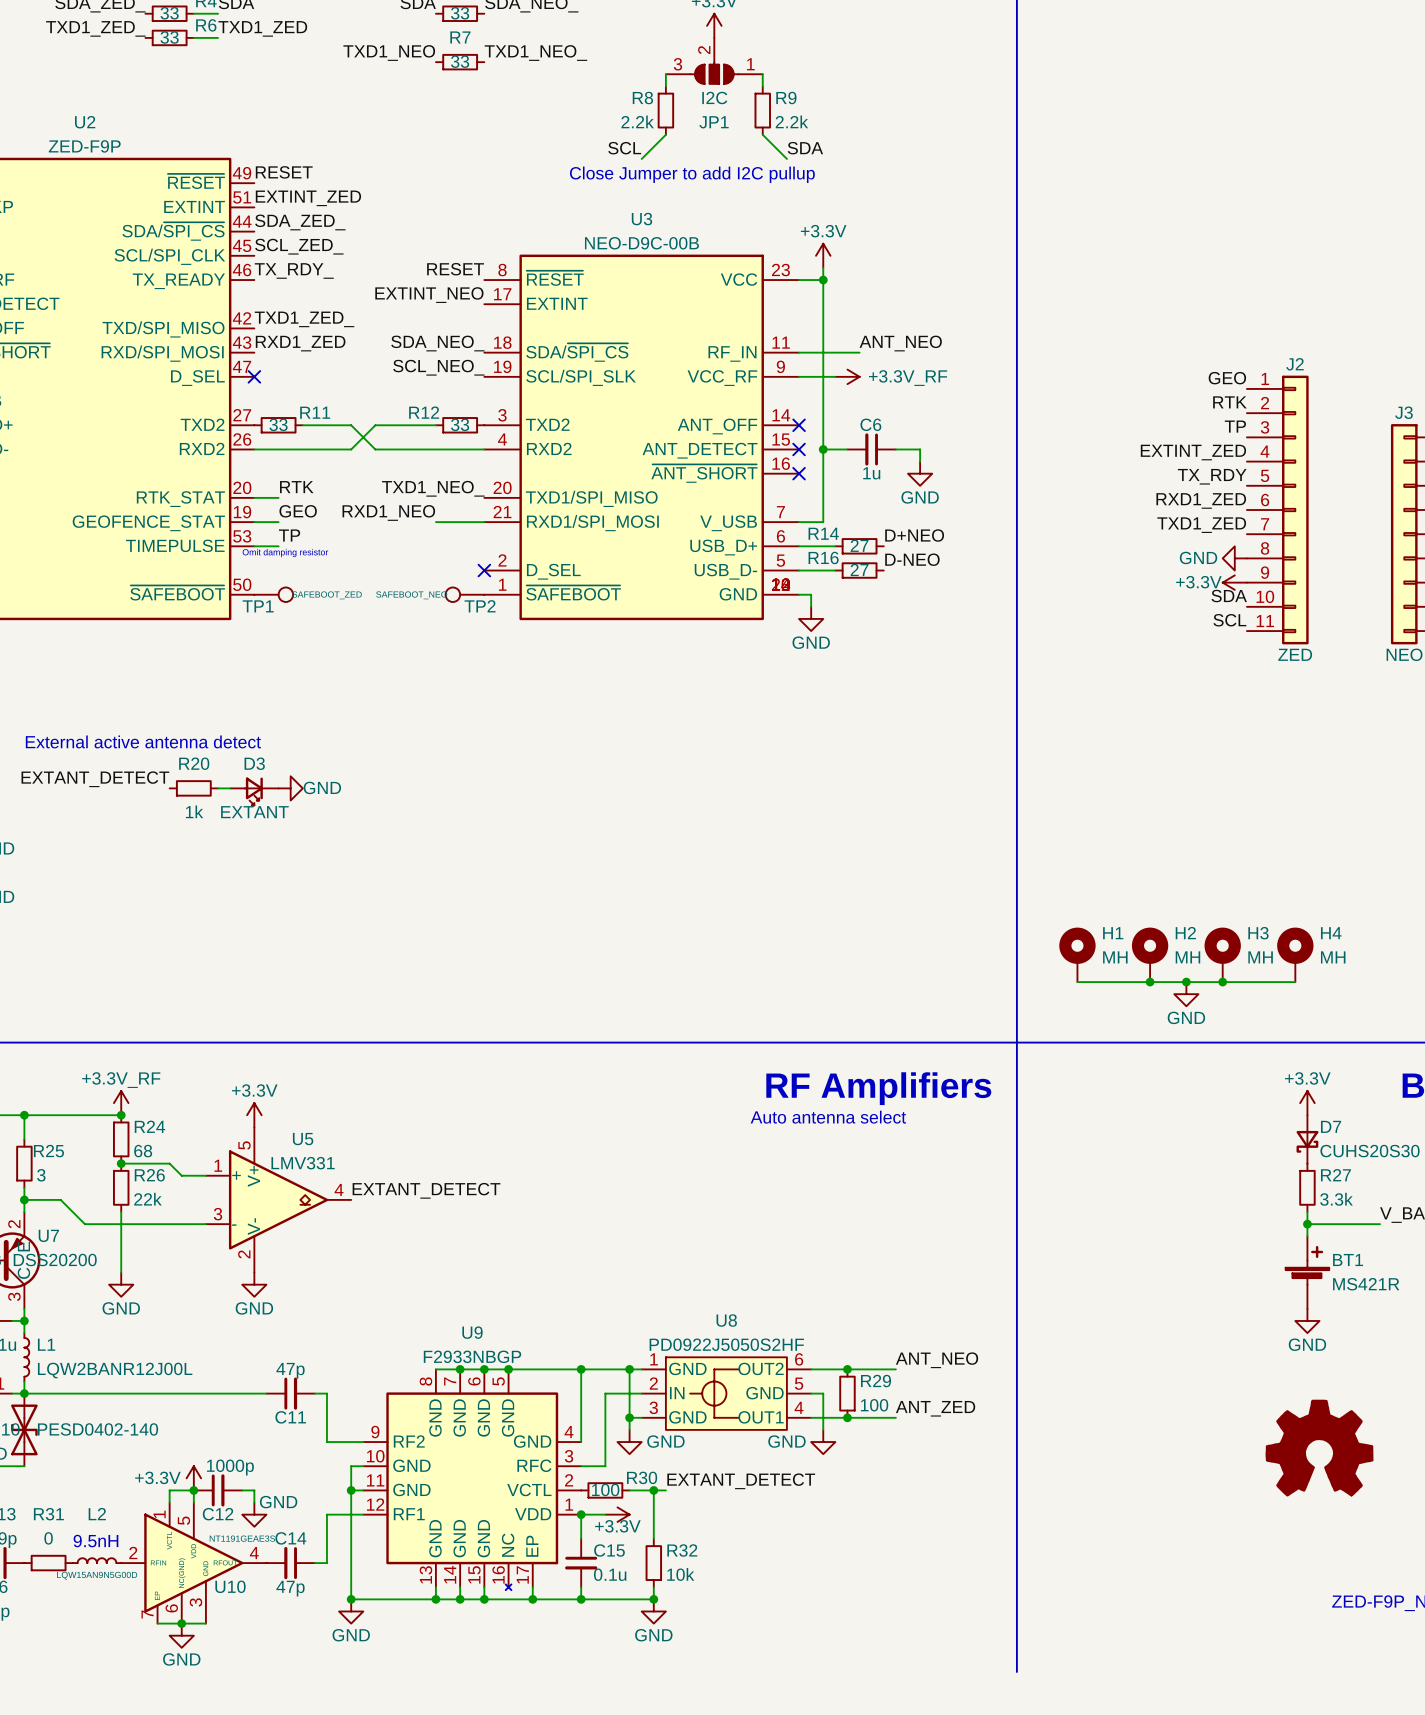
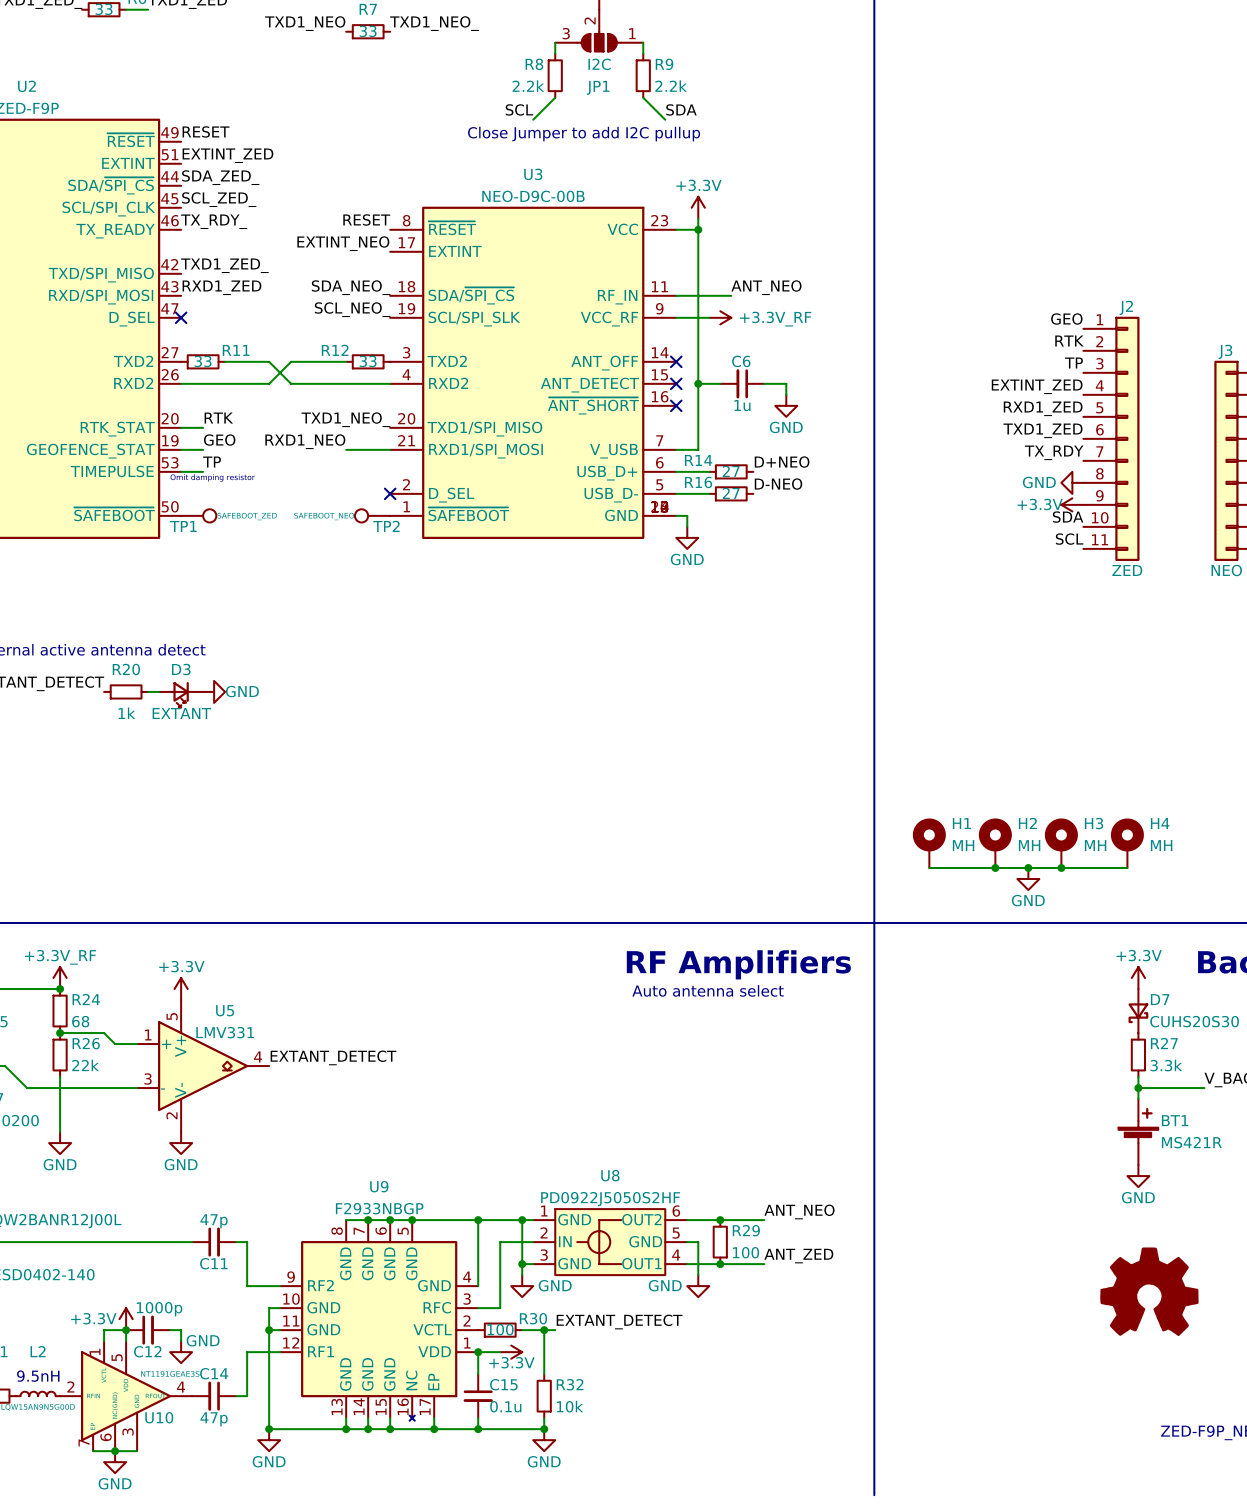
label: TX_RDY (1212, 476) -> RXD1_ZED (1043, 408)
label: RXD1_ZED (1201, 500) -> TXD1_ZED (1043, 430)
label: TXD1_ZED (1201, 525) -> TX_RDY (1054, 452)

